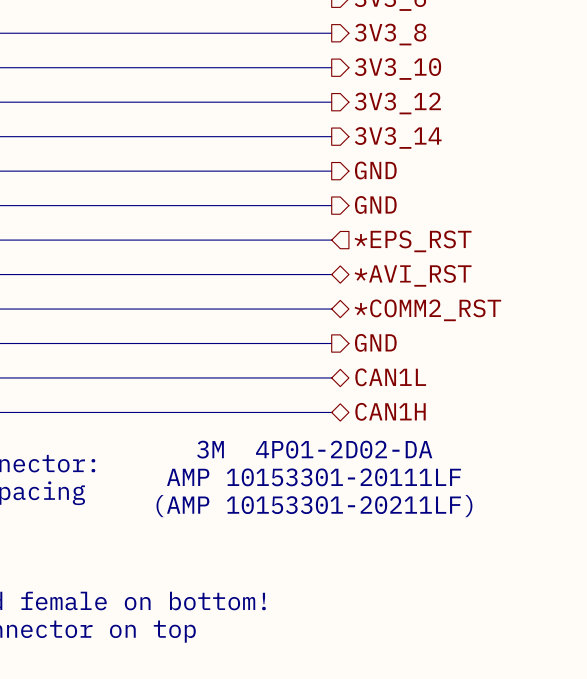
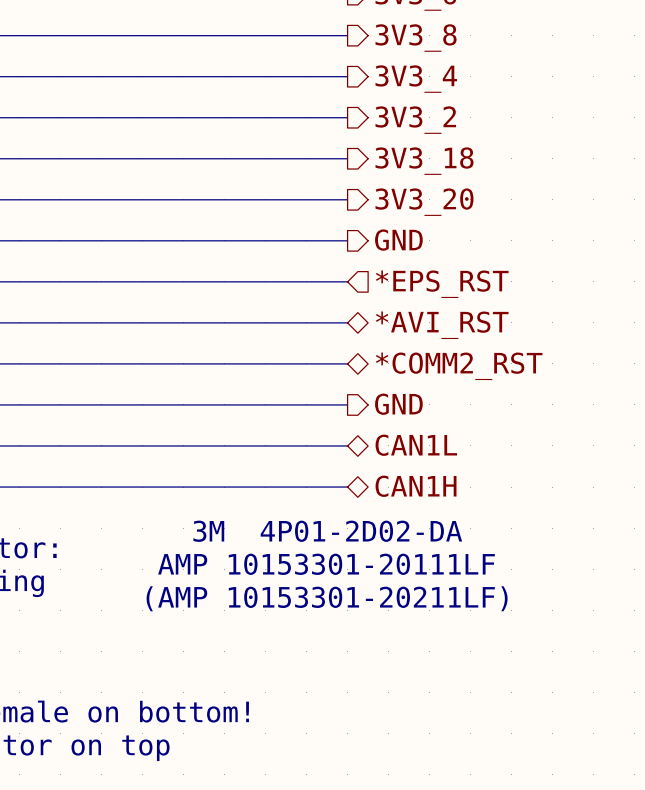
hierarchical label: 3V3_10 (397, 69) -> 3V3_4 (416, 79)
hierarchical label: 3V3_12 (397, 103) -> 3V3_2 (415, 120)
hierarchical label: 3V3_14 (398, 137) -> 3V3_18 (424, 161)
hierarchical label: GND (375, 170) -> 3V3_20 (424, 202)

